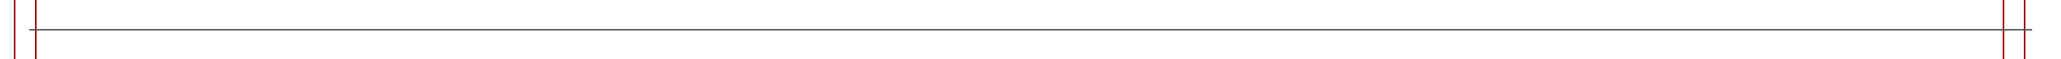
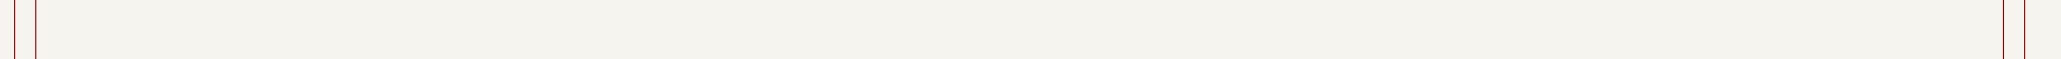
line: (29, 29) (2031, 29) -> none

